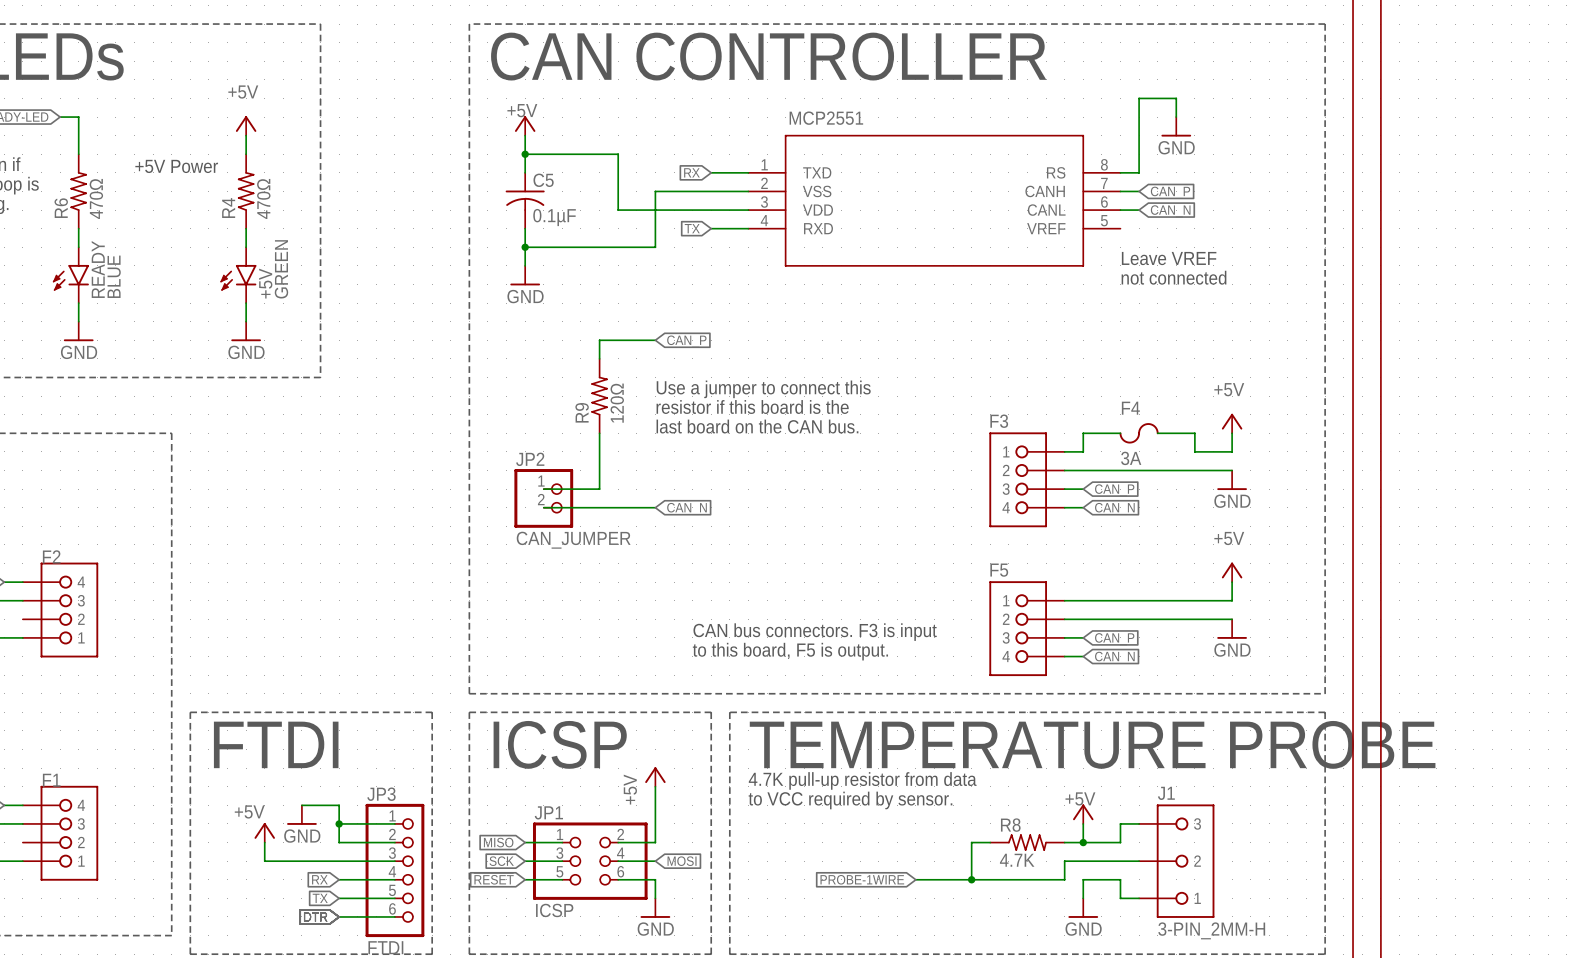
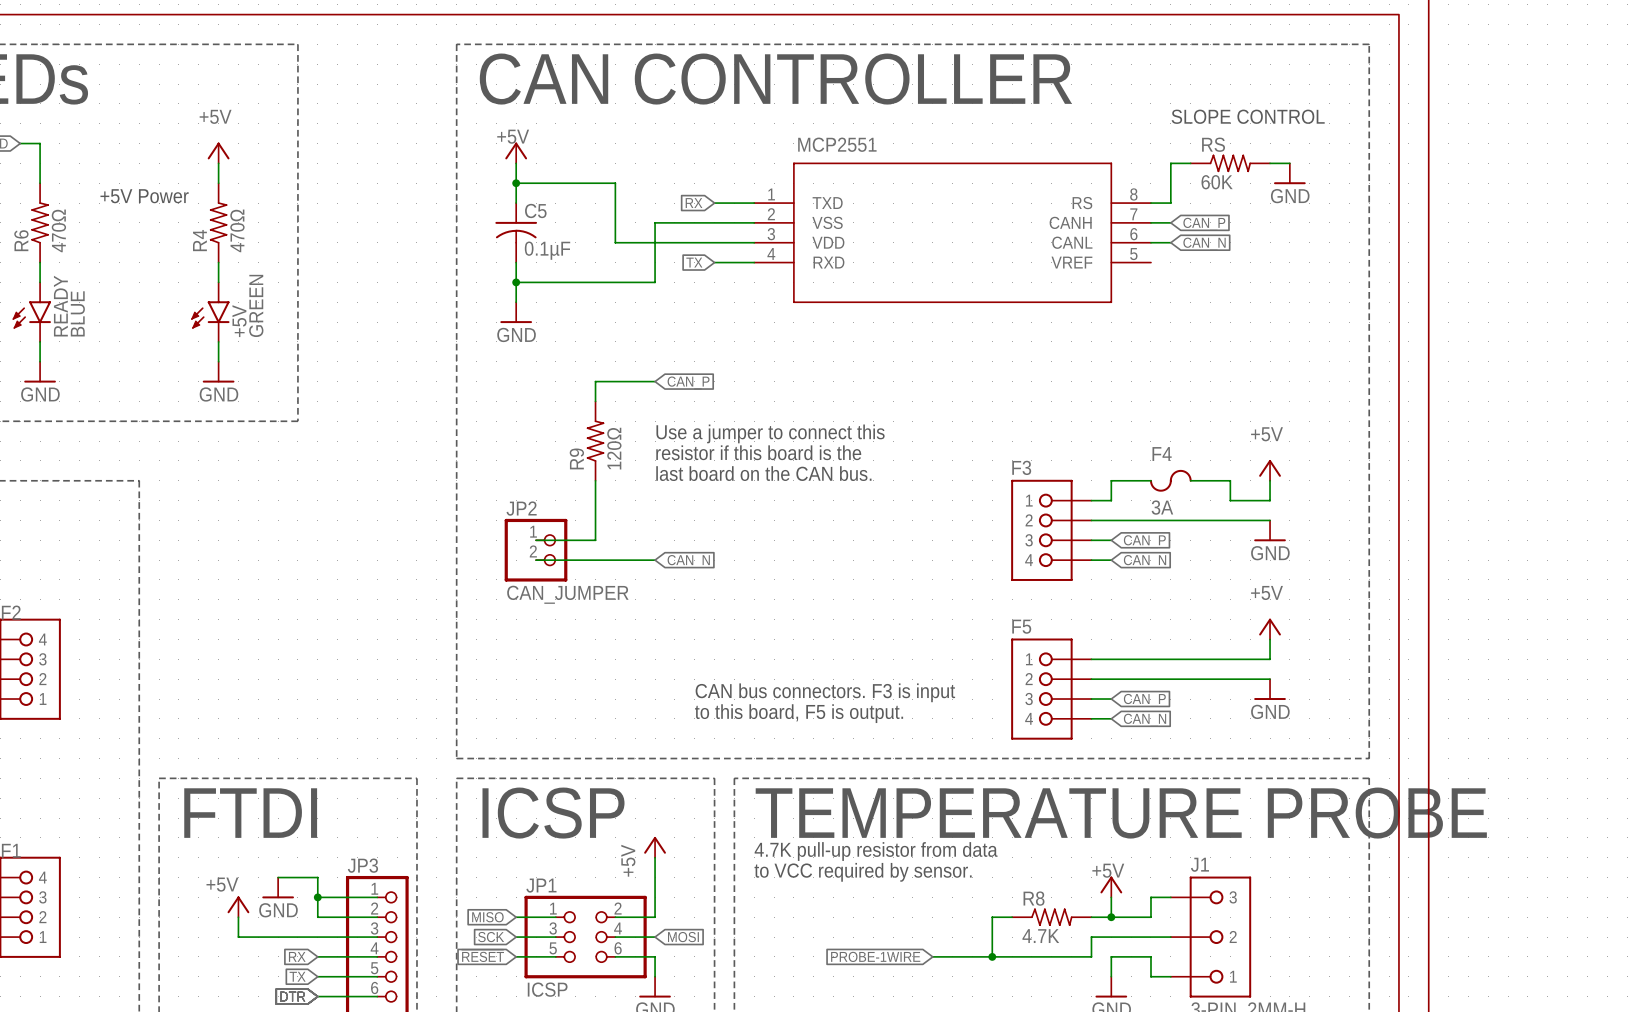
text: none -> SLOPE CONTROL (1248, 116)
wire: (1176, 117) (1176, 98) (1139, 98) (1139, 135) -> (1190, 163) (1170, 163)
power symbol position: GND (1176, 126) -> GND (1289, 173)
RS: none -> 60K (1230, 163)
wire: none -> (1270, 163) (1289, 163)
text: Leave VREF (1169, 258) -> none
text: not connected (1174, 277) -> none

